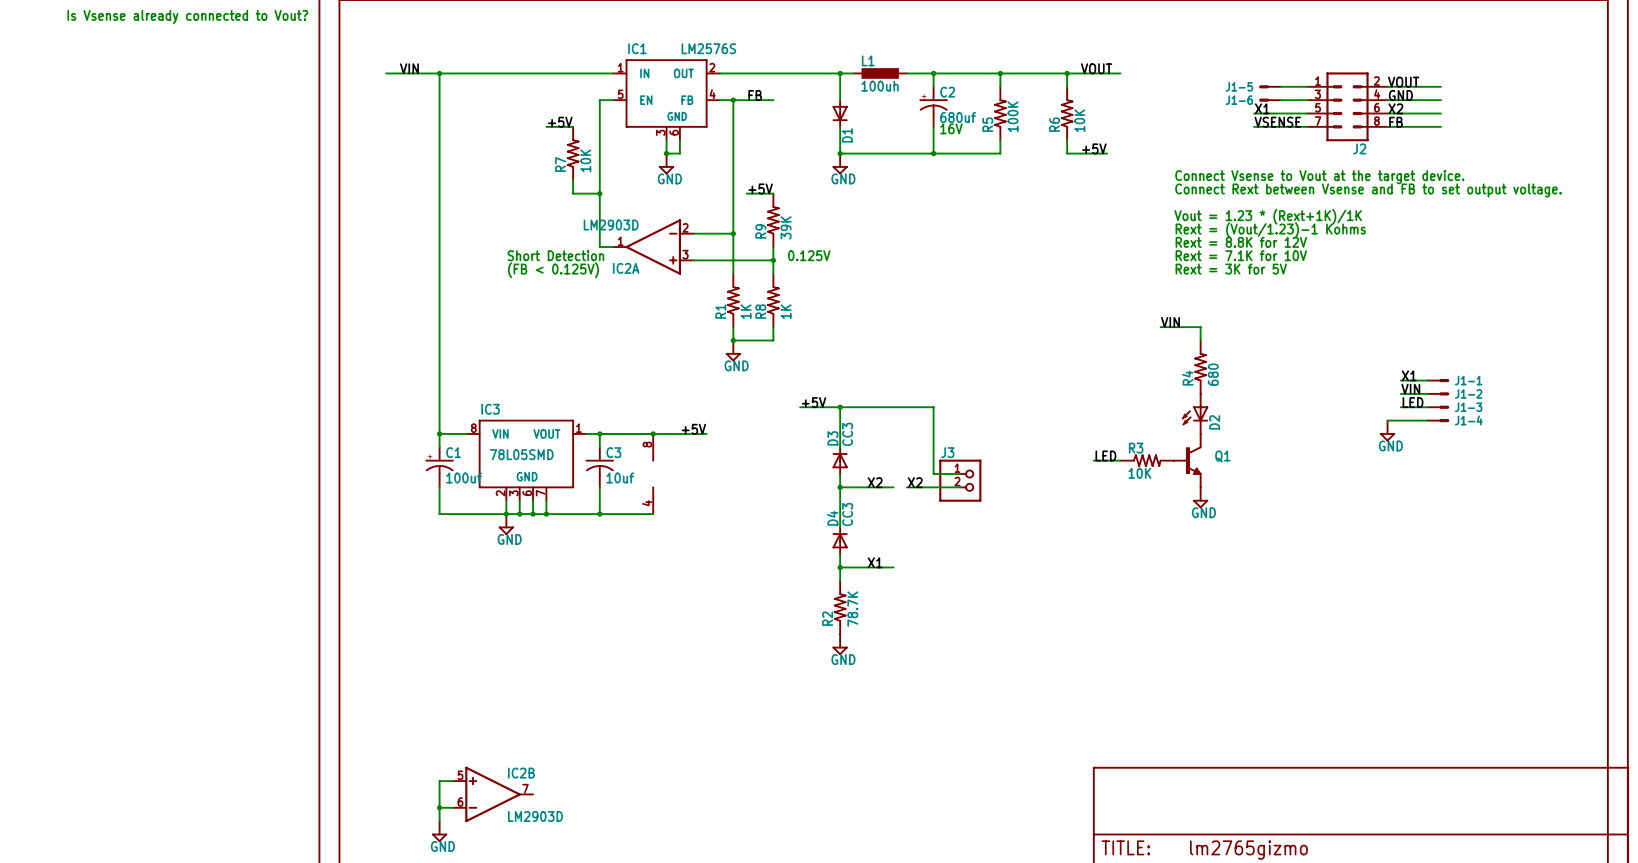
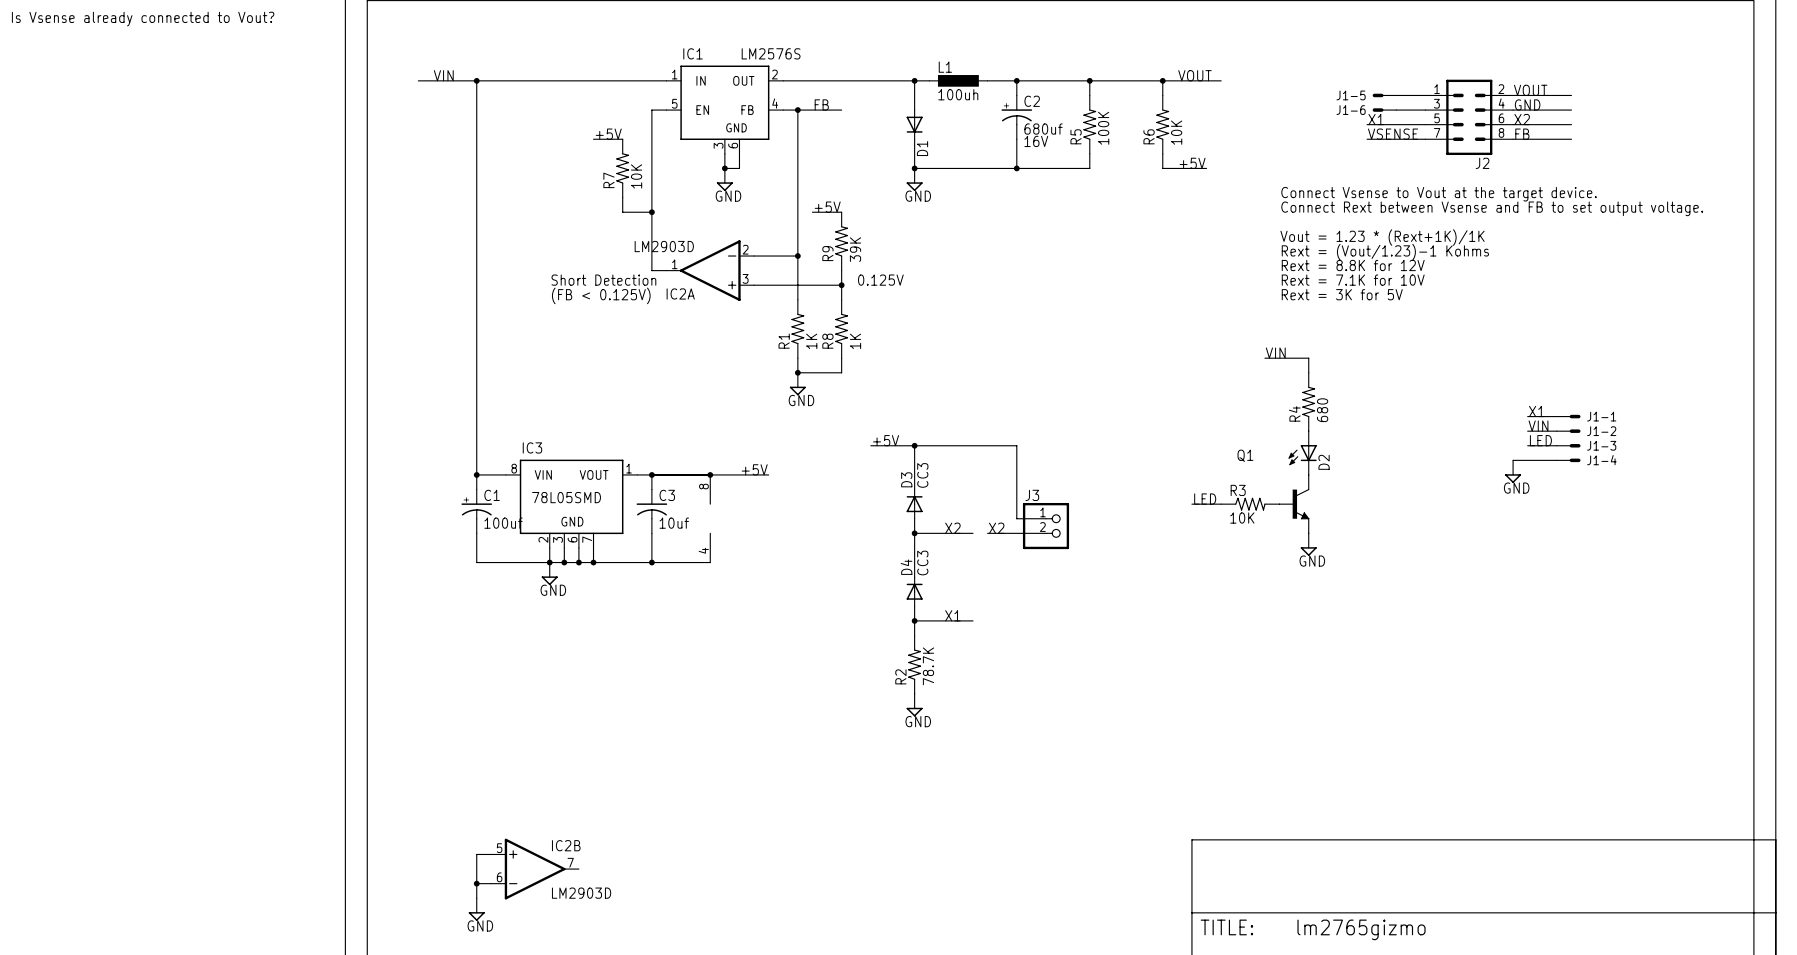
text position: Is Vsense already connected to Vout? (187, 16) -> Is Vsense already connected to Vout? (143, 19)
Q1 name position: Q1 (1222, 456) -> Q1 (1245, 455)

